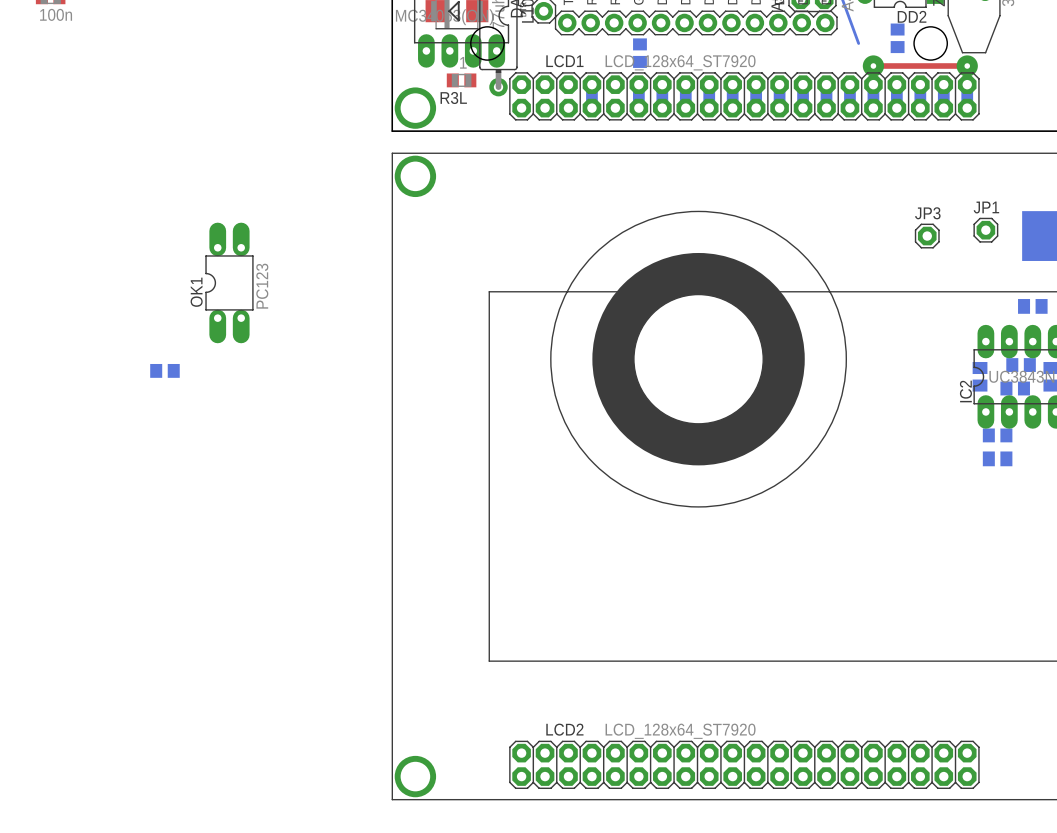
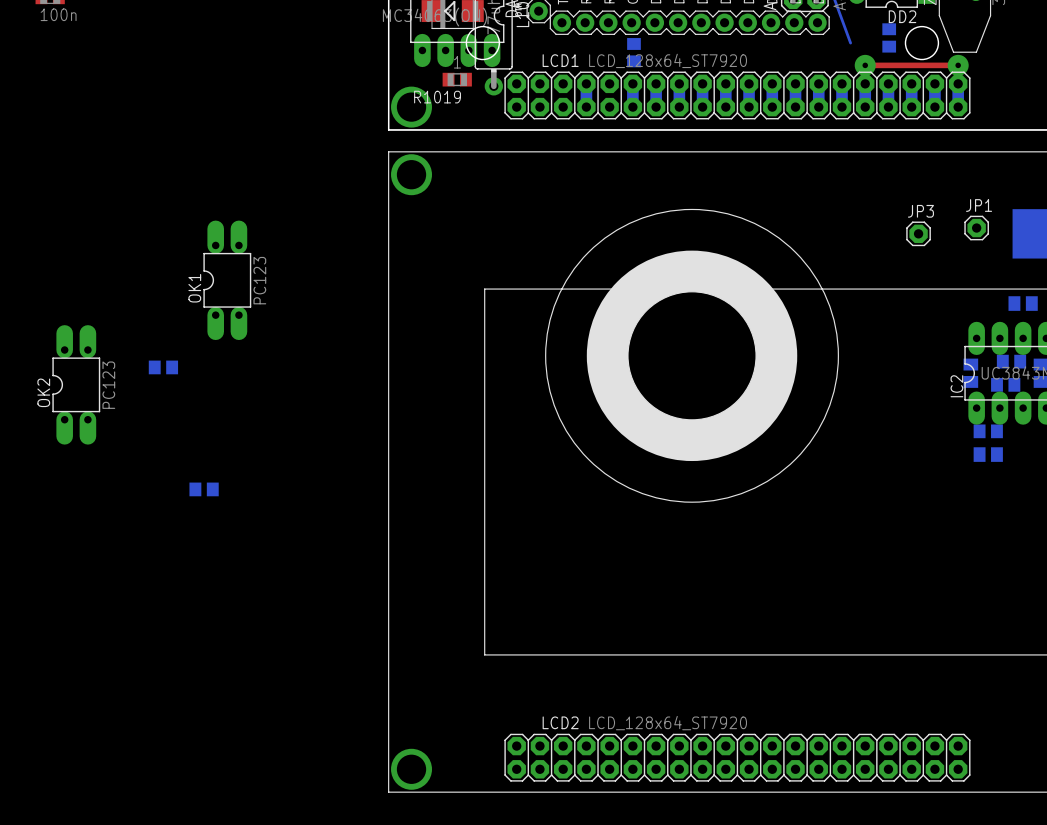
R3L name: R3L (453, 97) -> R1019 (437, 97)
OK2: none -> PC123 (76, 384)
part: none -> (204, 489)

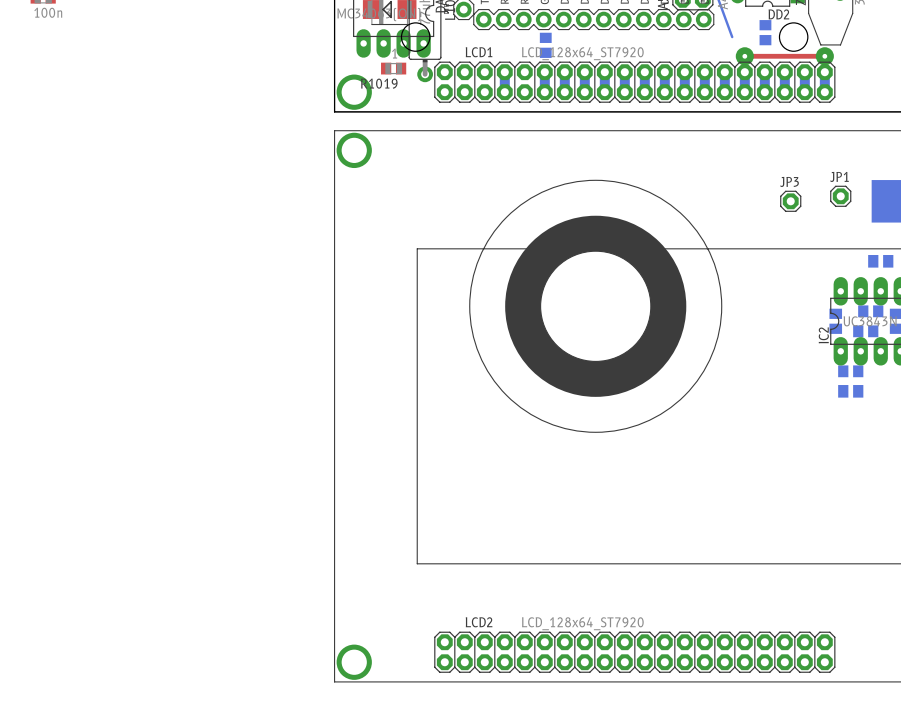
OK1: PC123 (227, 280) -> none
part: (163, 367) -> none
OK2: PC123 (76, 384) -> none
part: (204, 489) -> none

